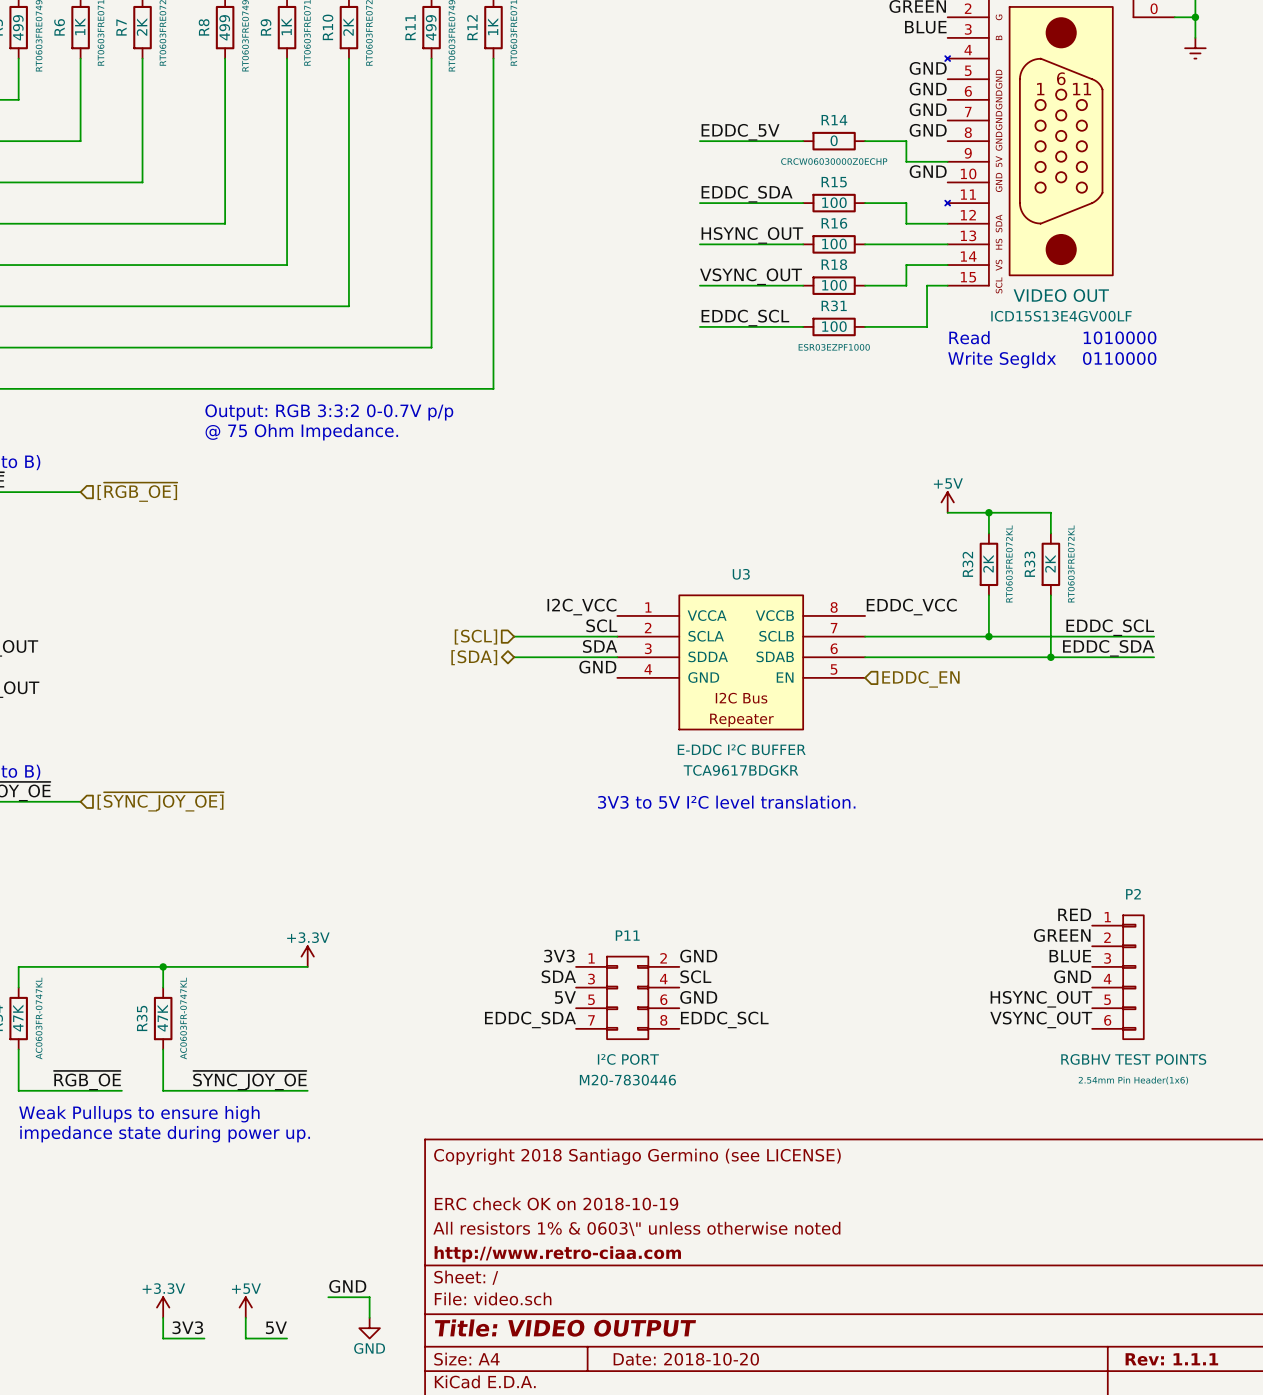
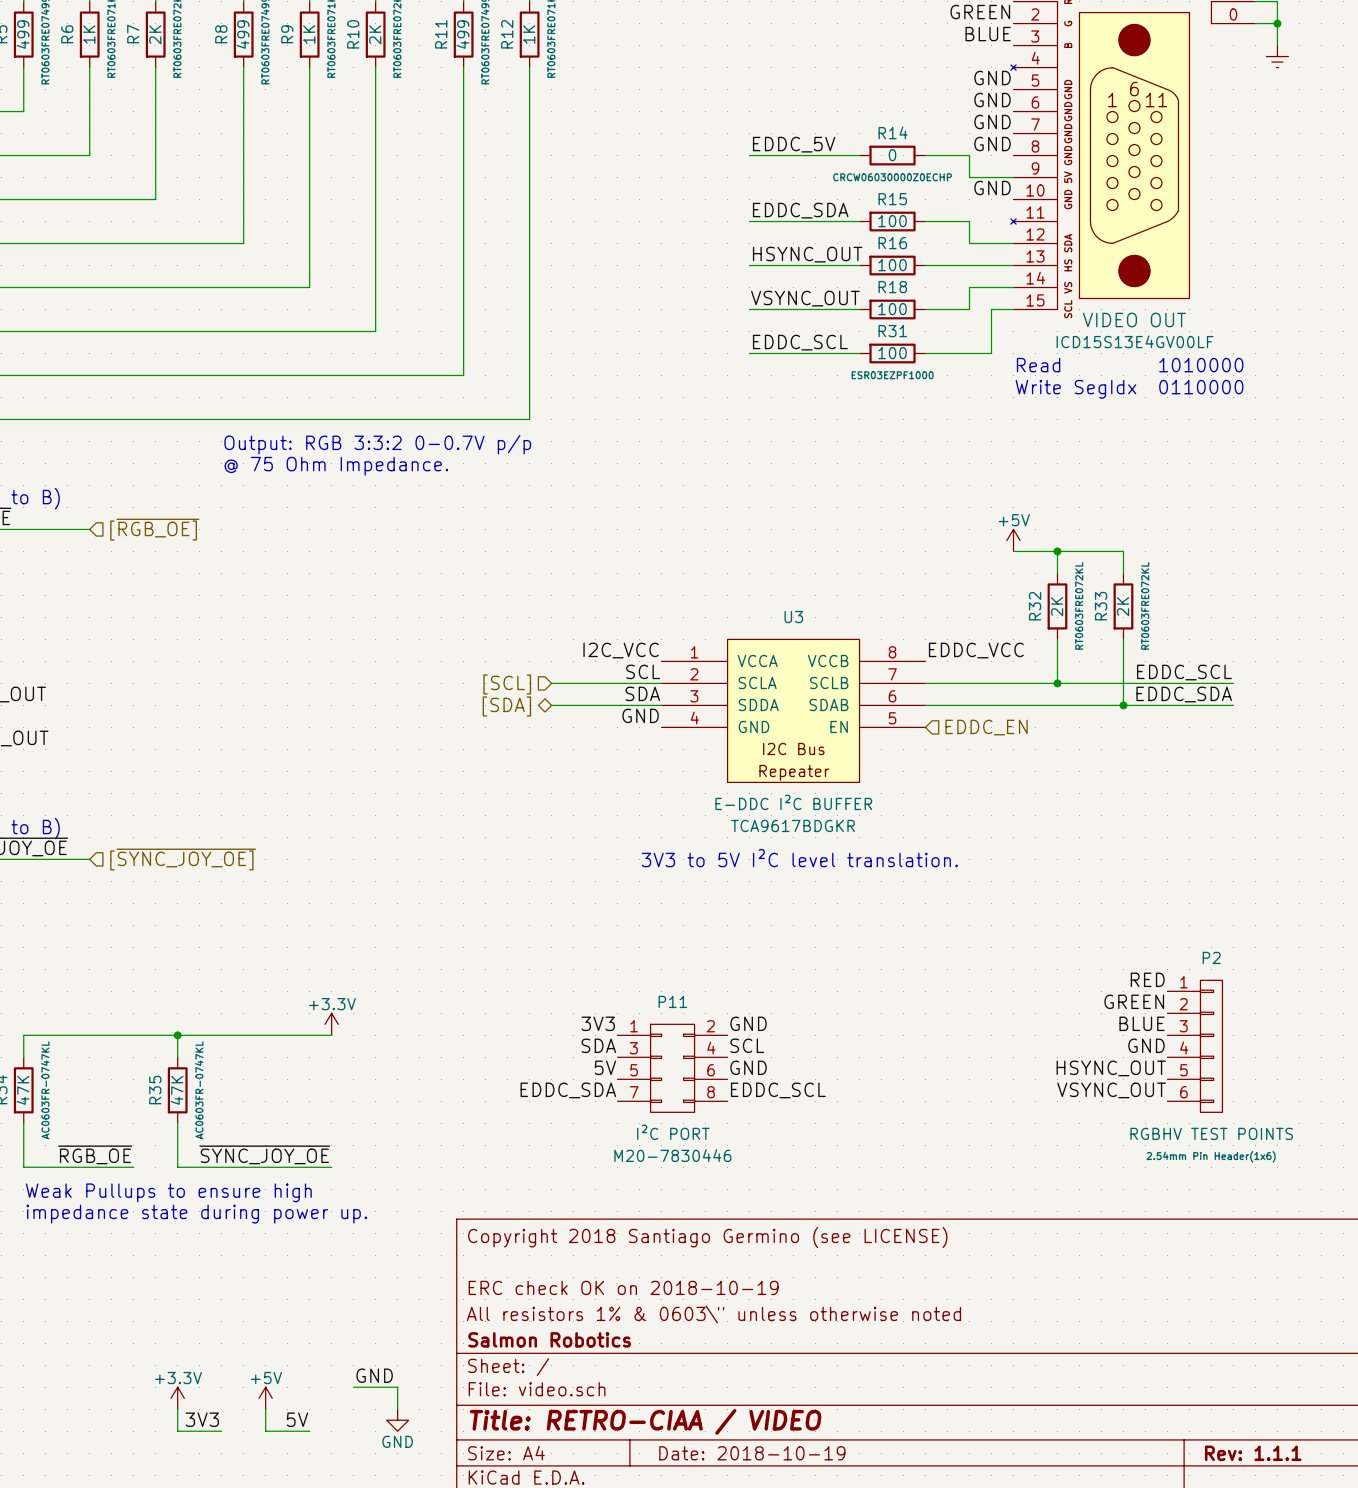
title block: http://www.retro-ciaa.com (557, 1254) -> Salmon Robotics (549, 1339)
title block: Title: VIDEO OUTPUT (565, 1328) -> Title: RETRO-CIAA / VIDEO (645, 1421)
title block: Date: 2018-10-20 (686, 1359) -> Date: 2018-10-19 (752, 1453)

